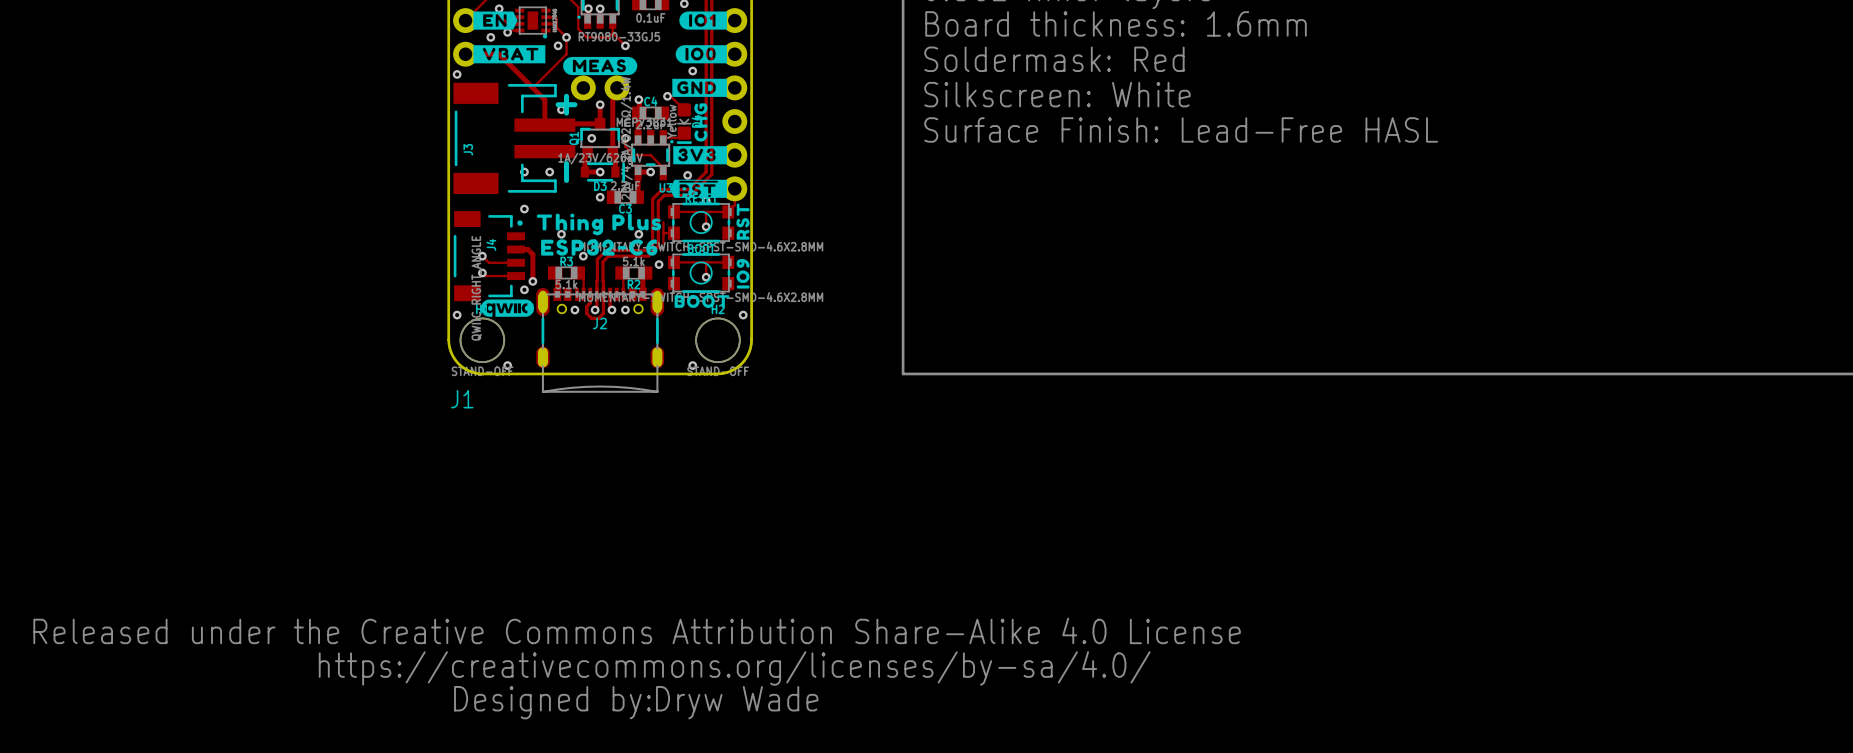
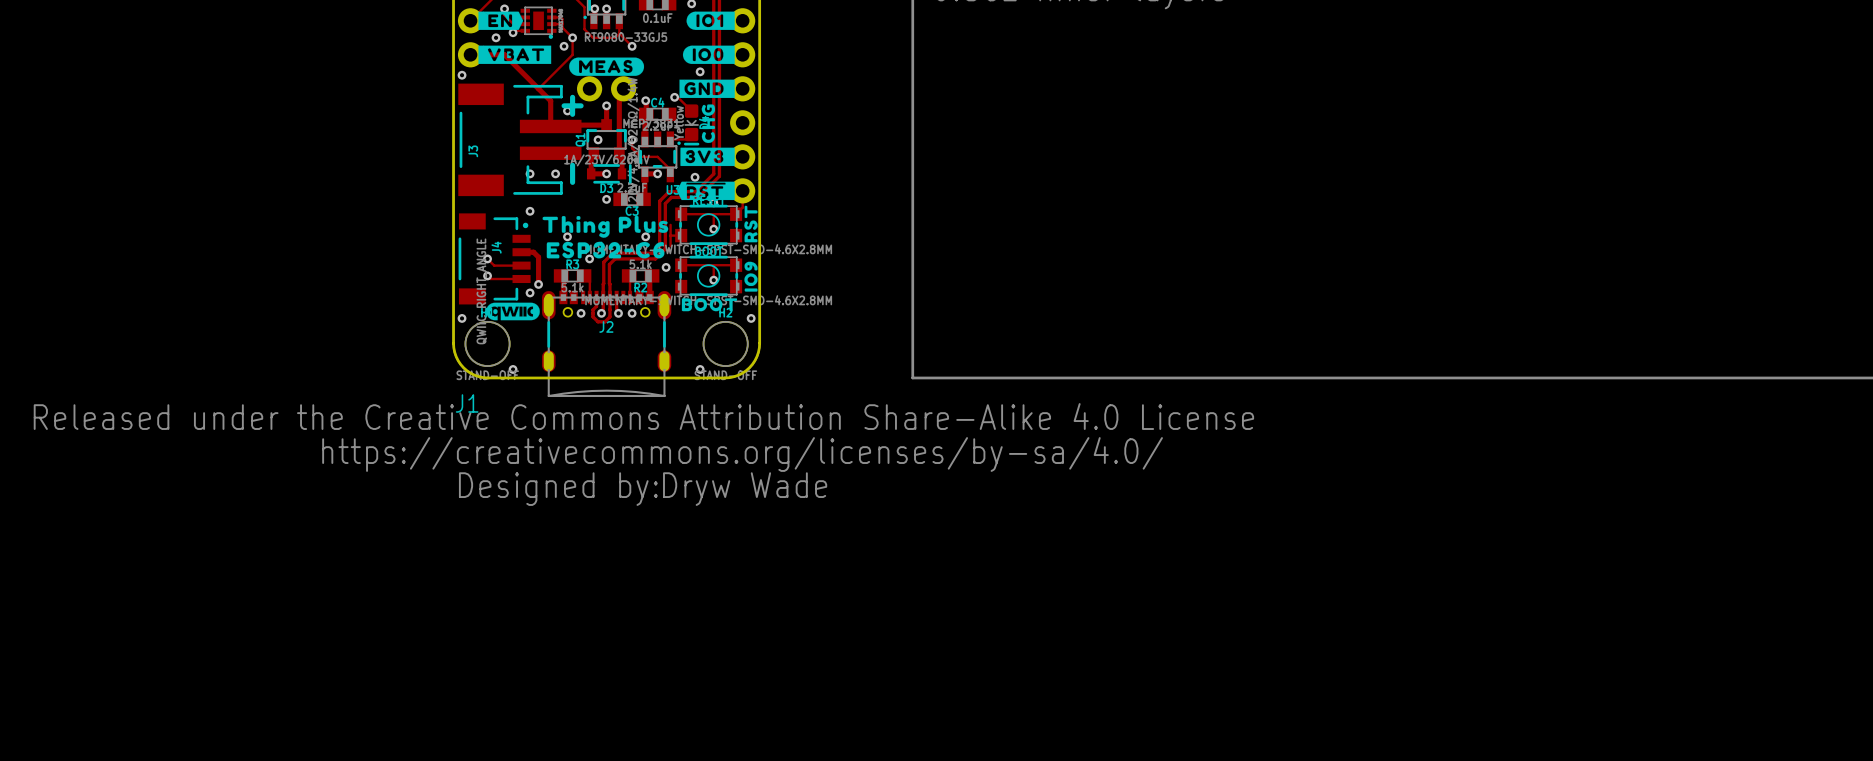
text: Board thickness: 1.6mm (1116, 23) -> none
text: Soldermask: Red (1054, 59) -> none
text: Silkscreen: White (1057, 94) -> none
text: Surface Finish: Lead-Free HASL (1181, 129) -> none
drawing position: (637, 668) -> (643, 454)
text position: Dryw Wade (737, 702) -> Dryw Wade (745, 489)

